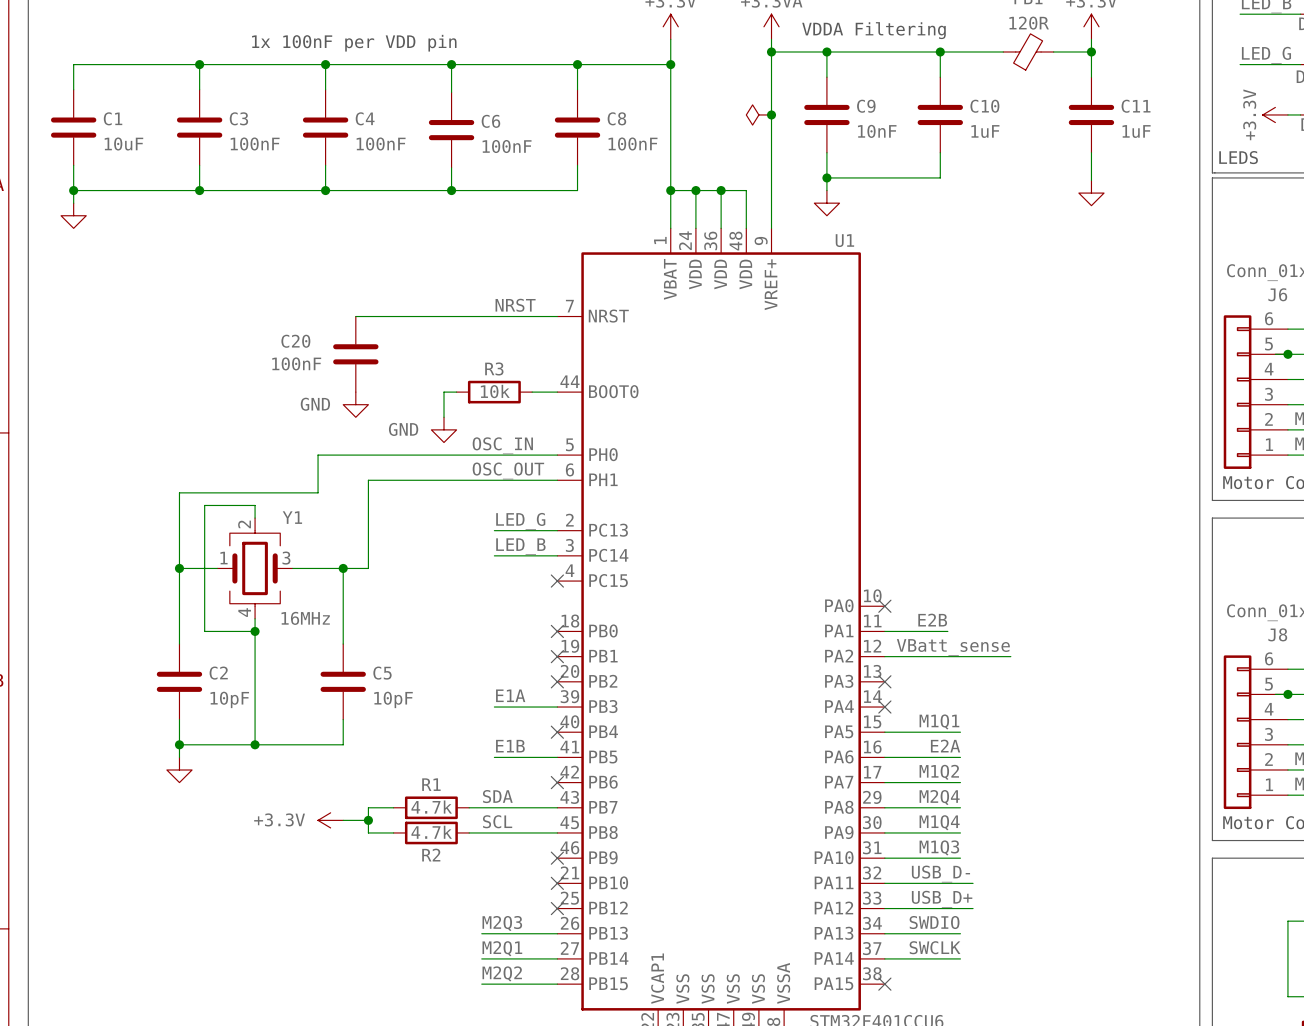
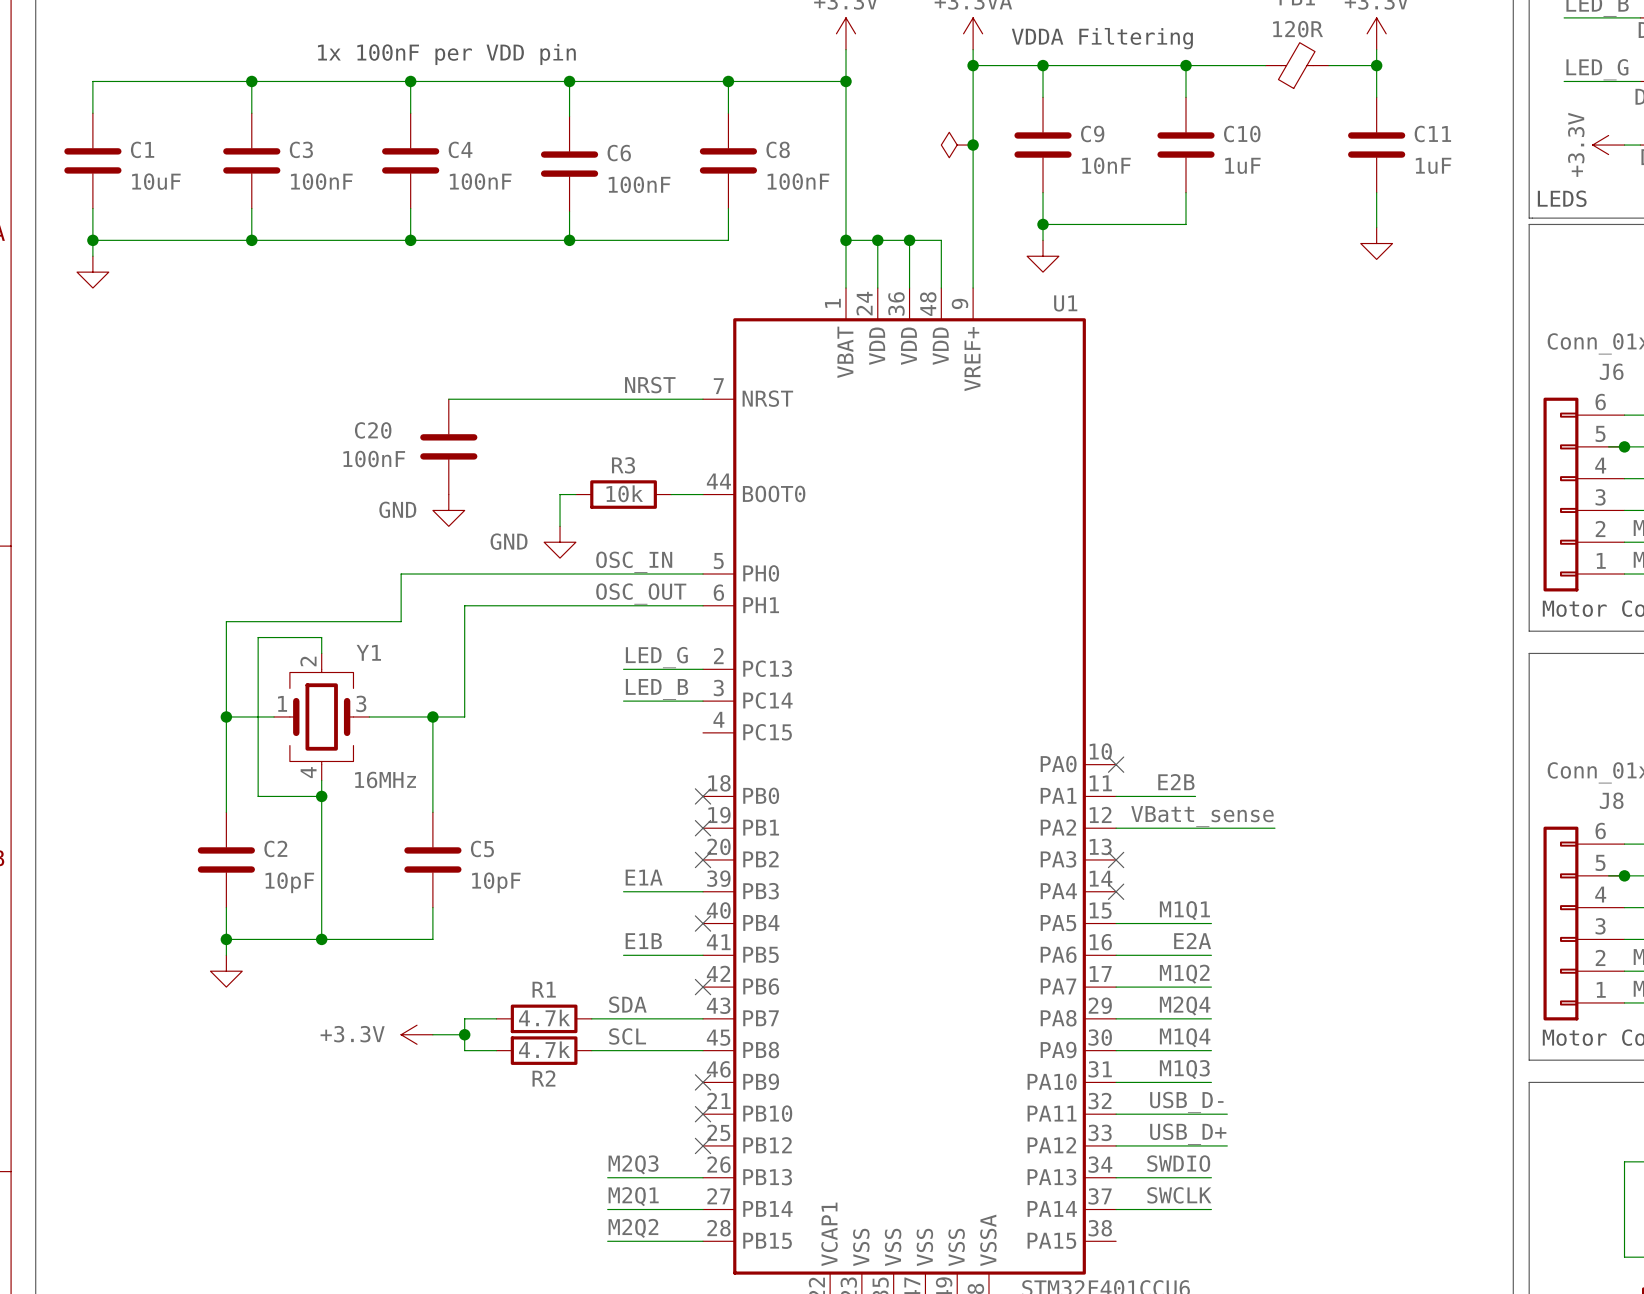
no-connect mark: (557, 581) -> none
no-connect mark: (884, 984) -> none

